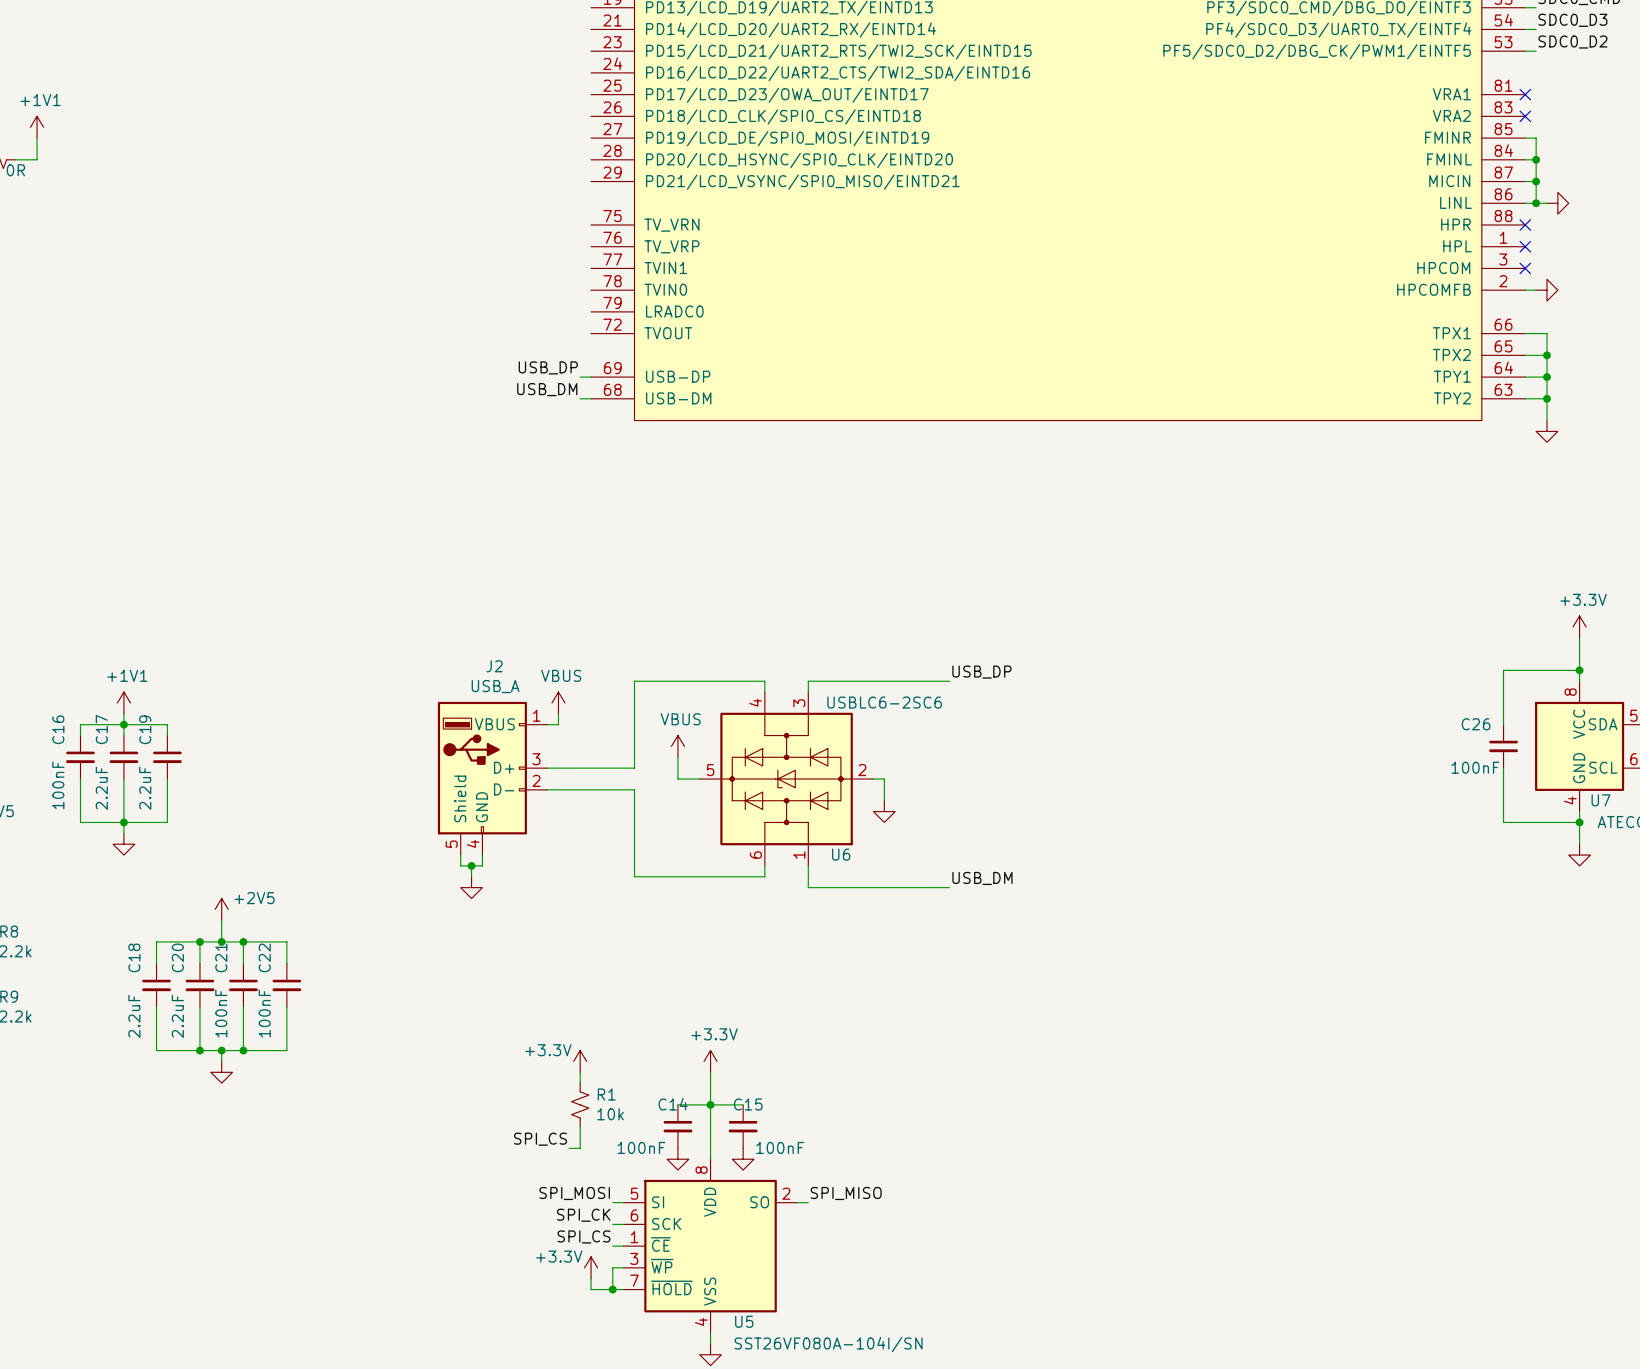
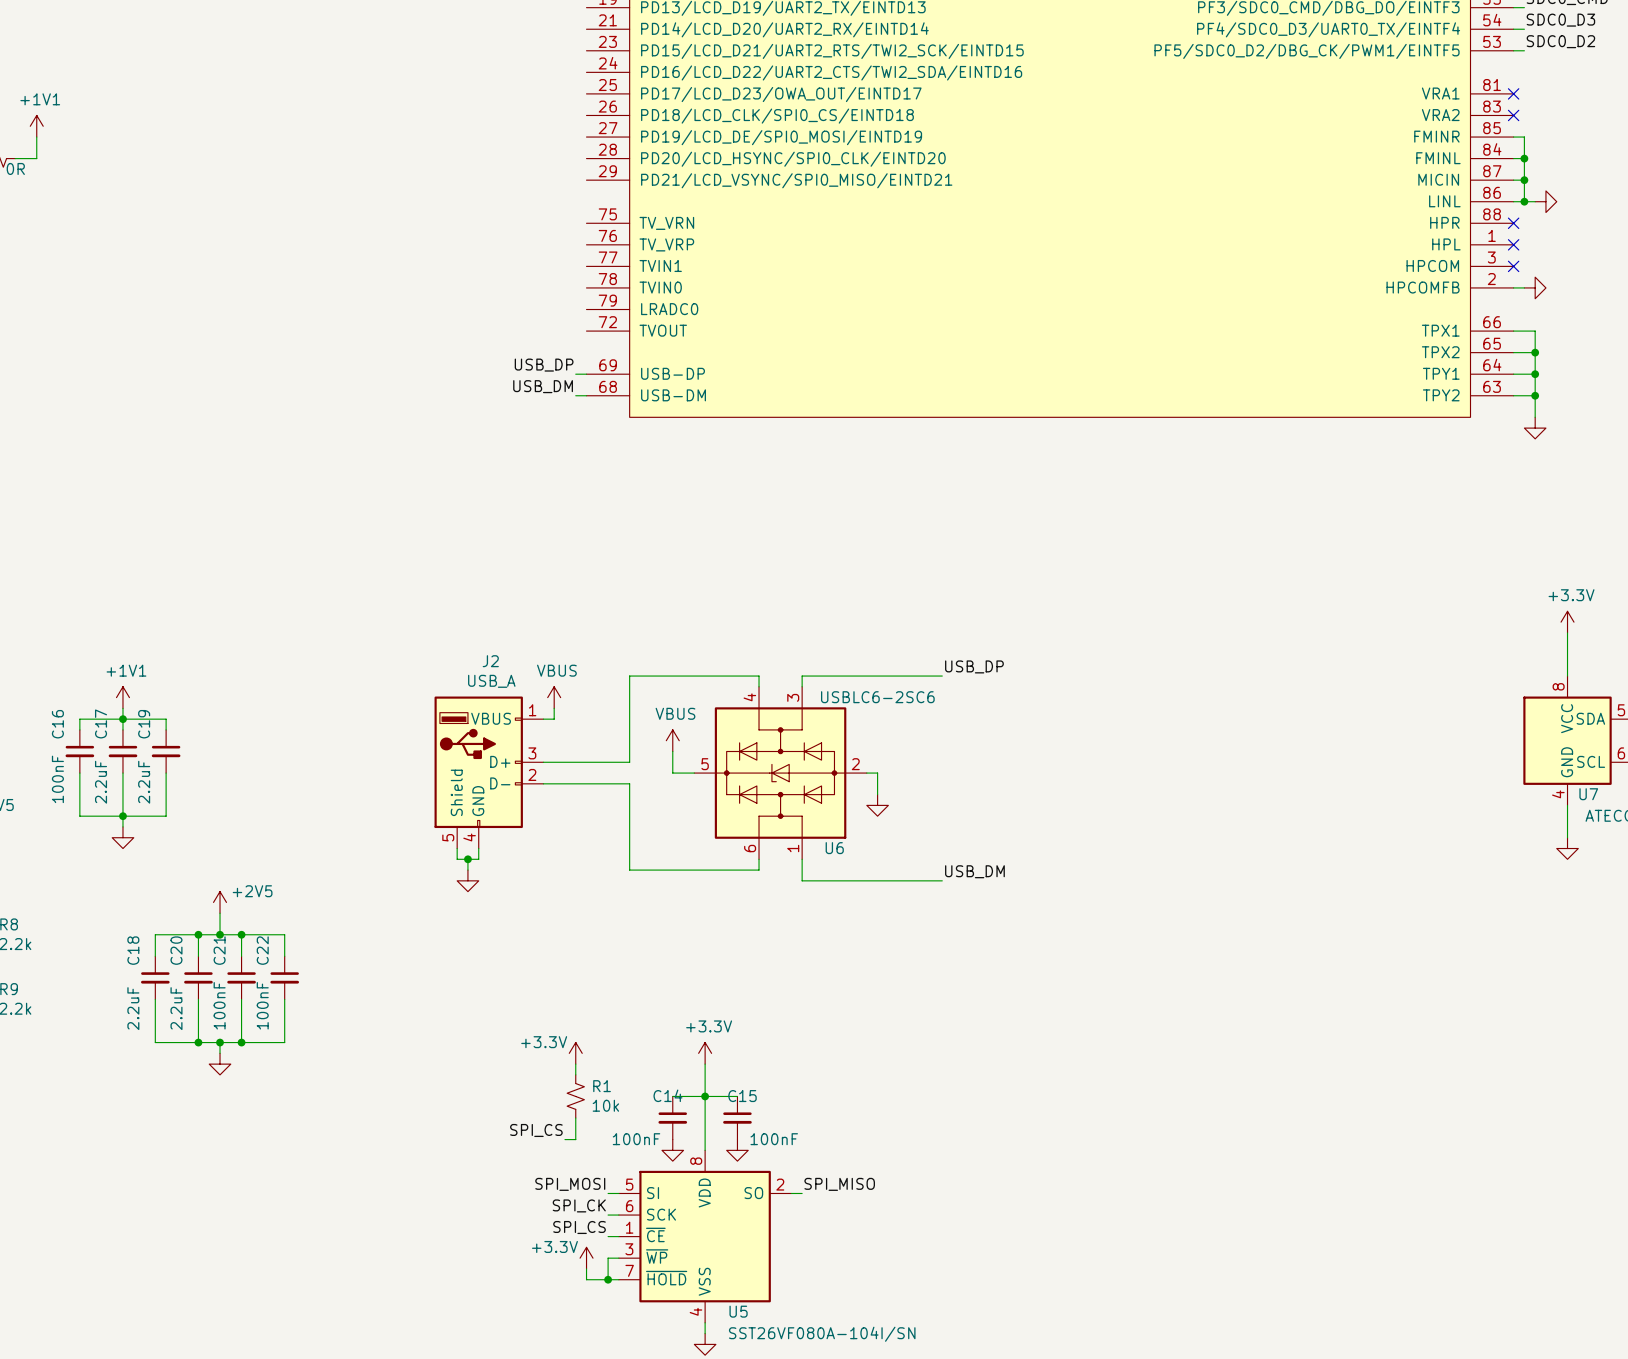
wire: (1579, 670) (1503, 670) (1503, 724) -> none
junction: (1579, 670) -> none
C26: 100nF (1503, 746) -> none
wire: (1503, 768) (1503, 822) (1579, 822) -> none
junction: (1579, 822) -> none

